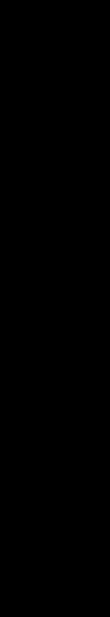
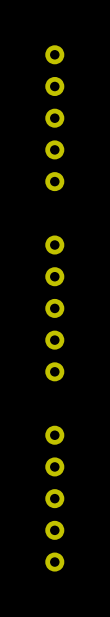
part: none -> (54, 118)
part: none -> (54, 308)
part: none -> (54, 498)

